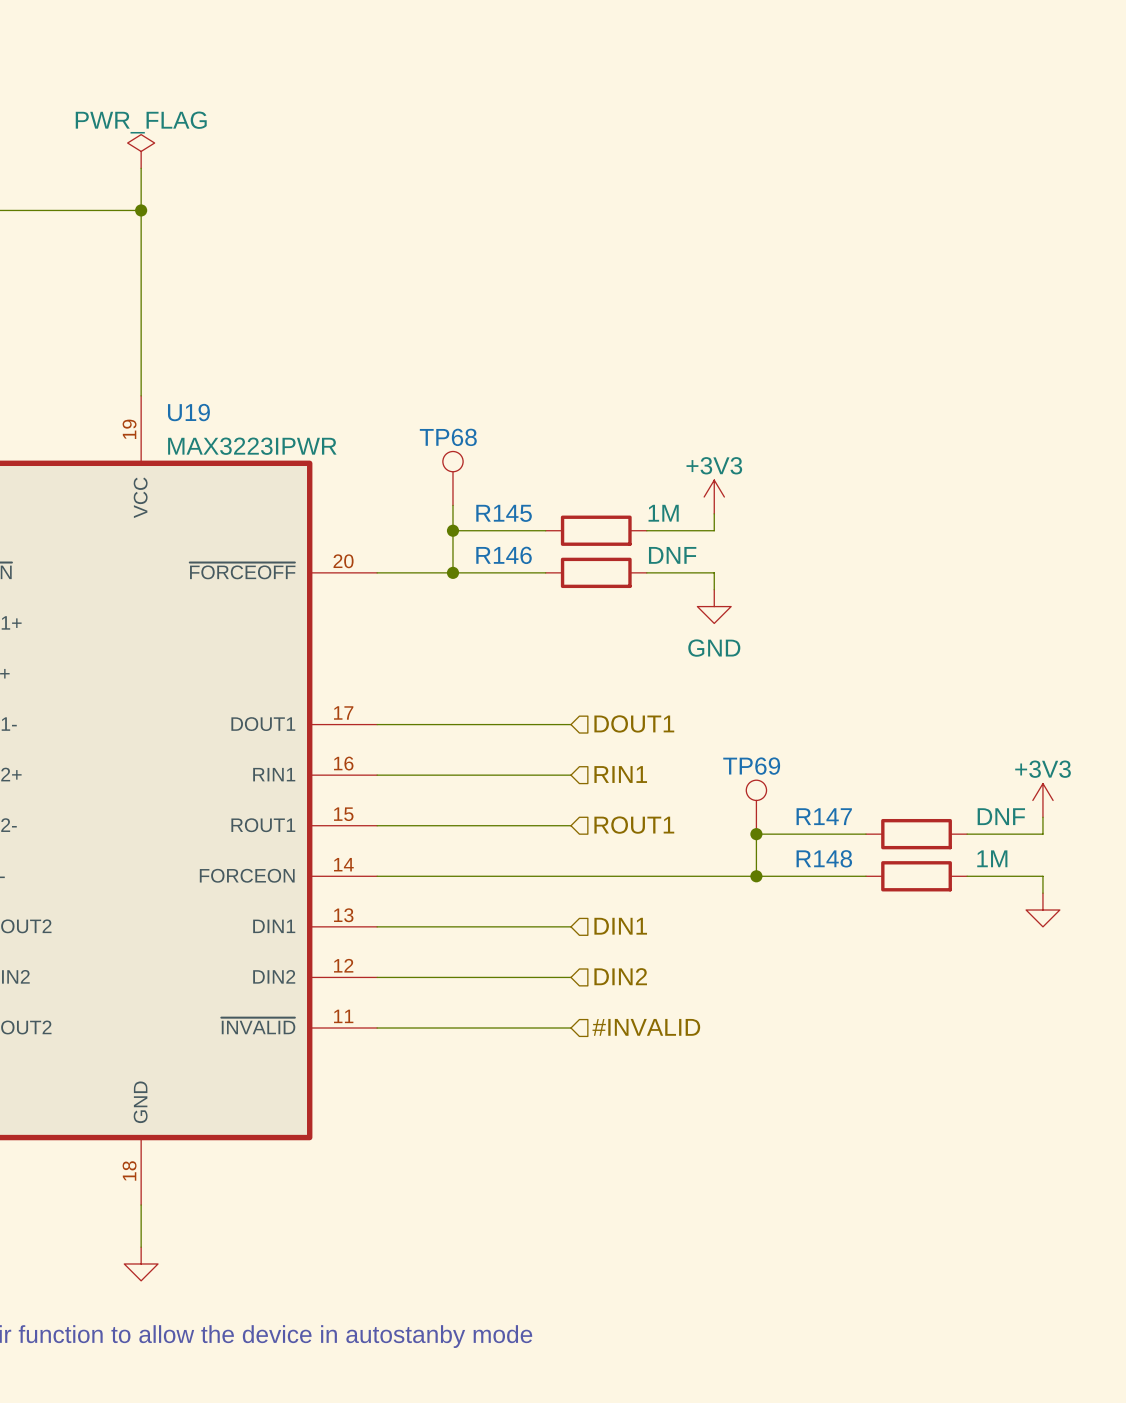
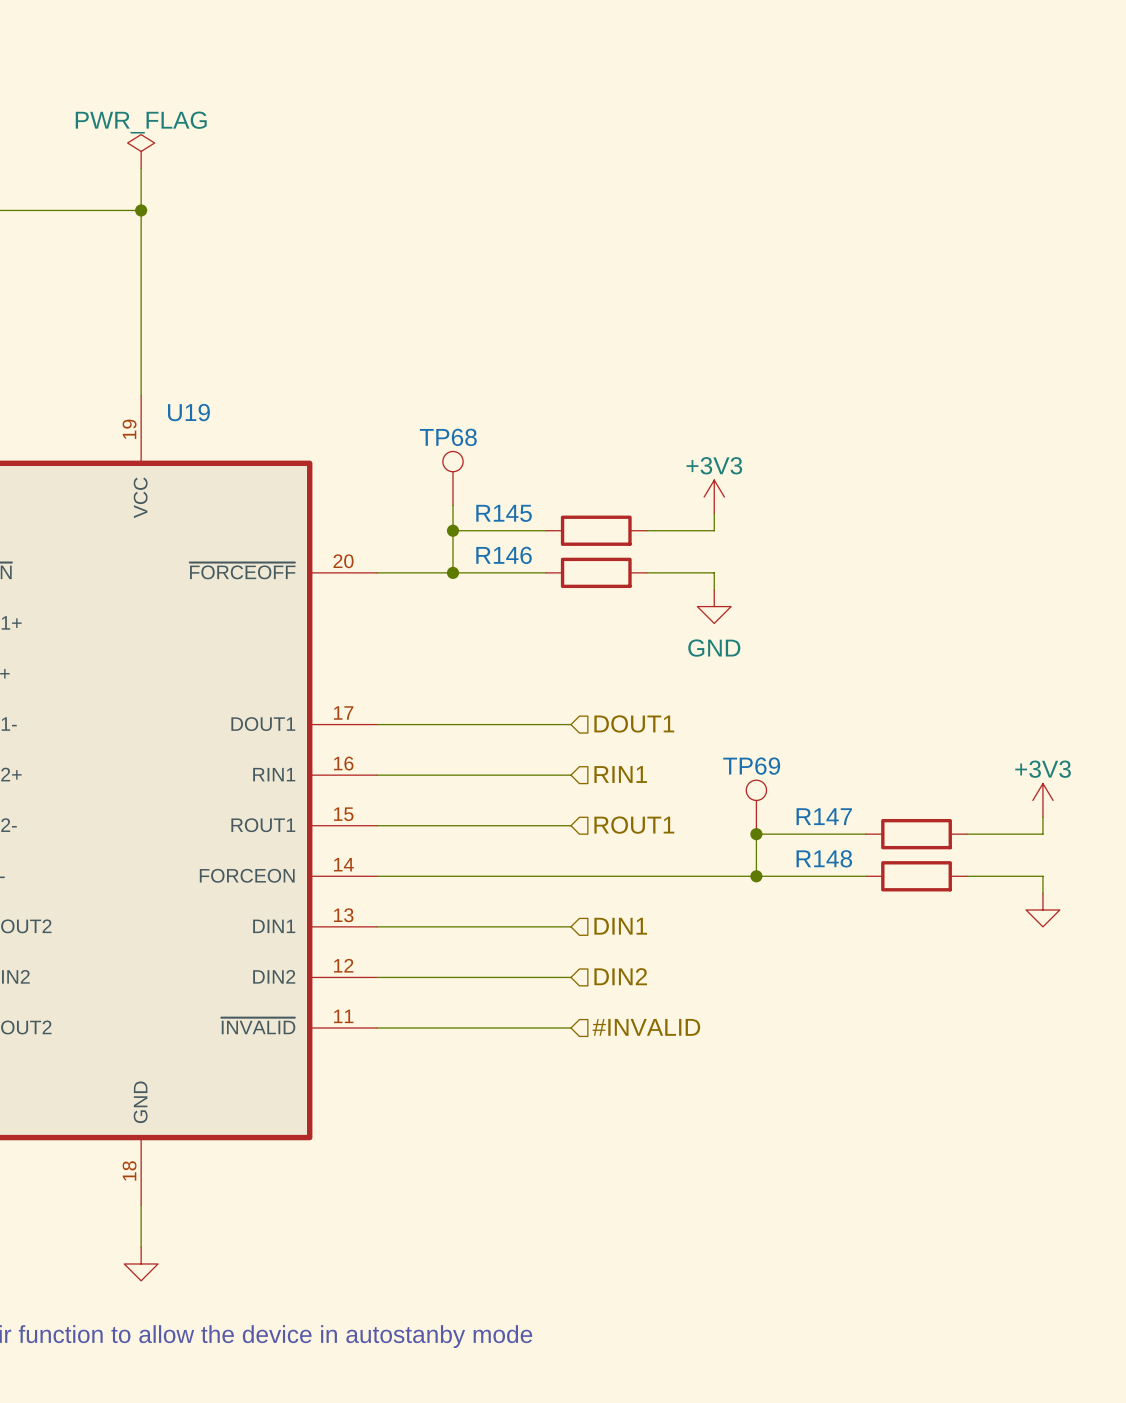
U19 value: MAX3223IPWR (252, 446) -> none
R145 value: 1M (663, 513) -> none
R146 value: DNF (672, 555) -> none
R147 value: DNF (1001, 816) -> none
R148 value: 1M (992, 858) -> none

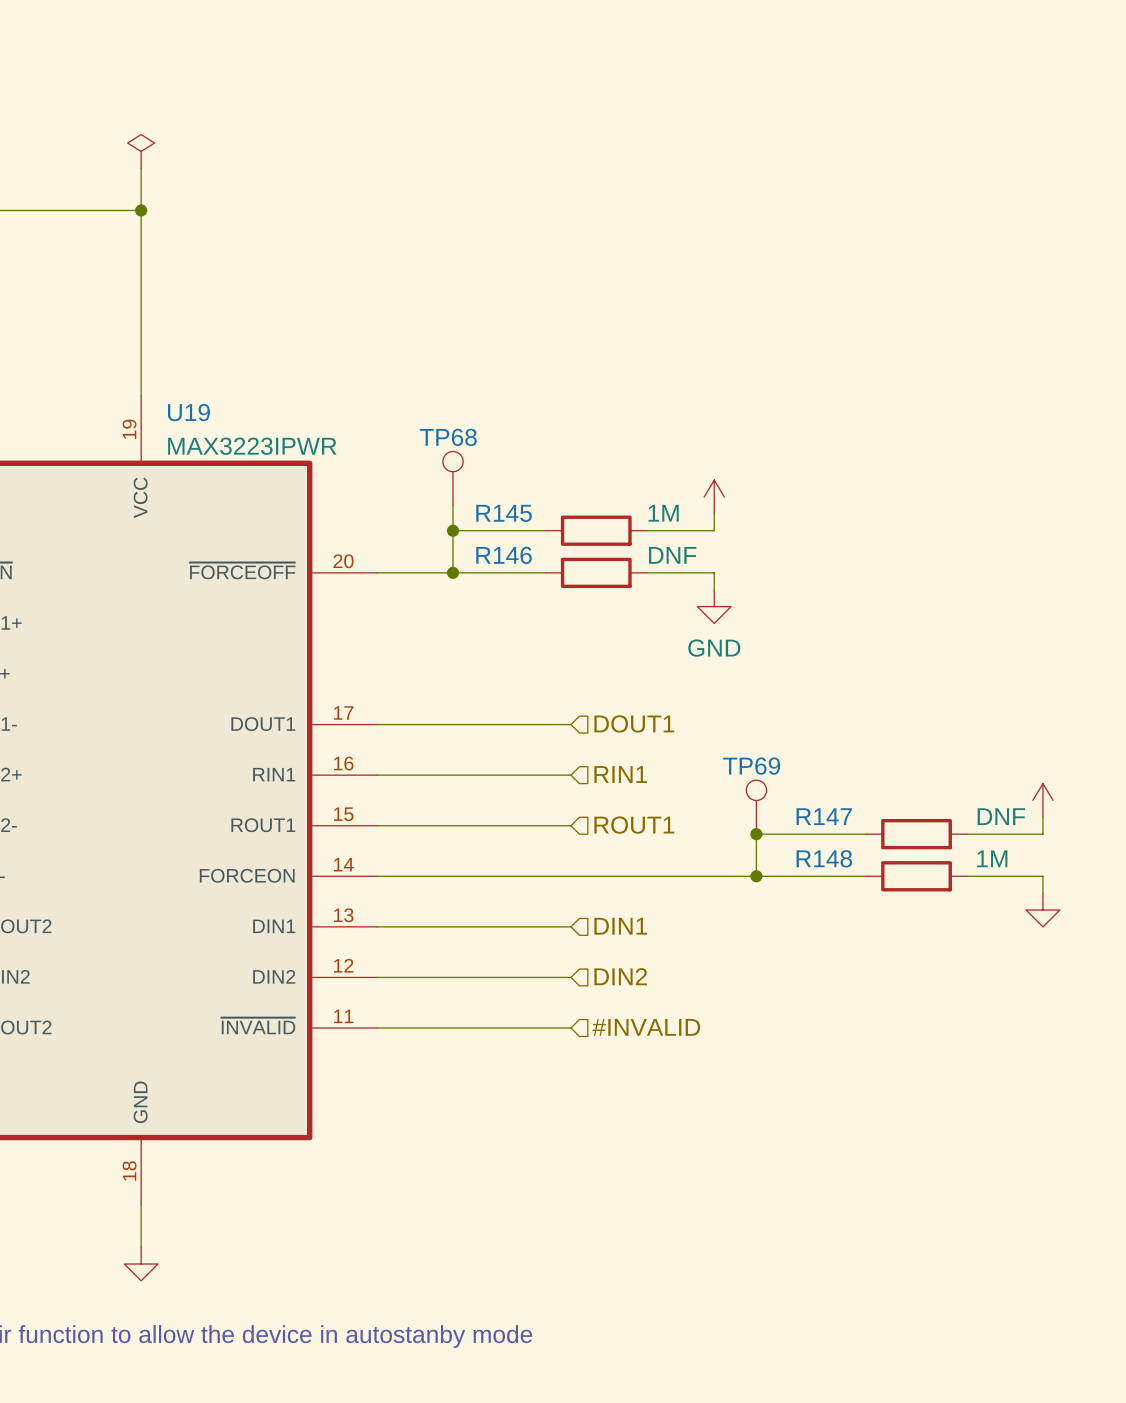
power symbol text: PWR_FLAG (141, 122) -> none
U19 value: none -> MAX3223IPWR (252, 446)
power symbol text: +3V3 (714, 465) -> none
R145 value: none -> 1M (663, 513)
R146 value: none -> DNF (672, 555)
power symbol text: +3V3 (1043, 769) -> none
R147 value: none -> DNF (1001, 816)
R148 value: none -> 1M (992, 858)

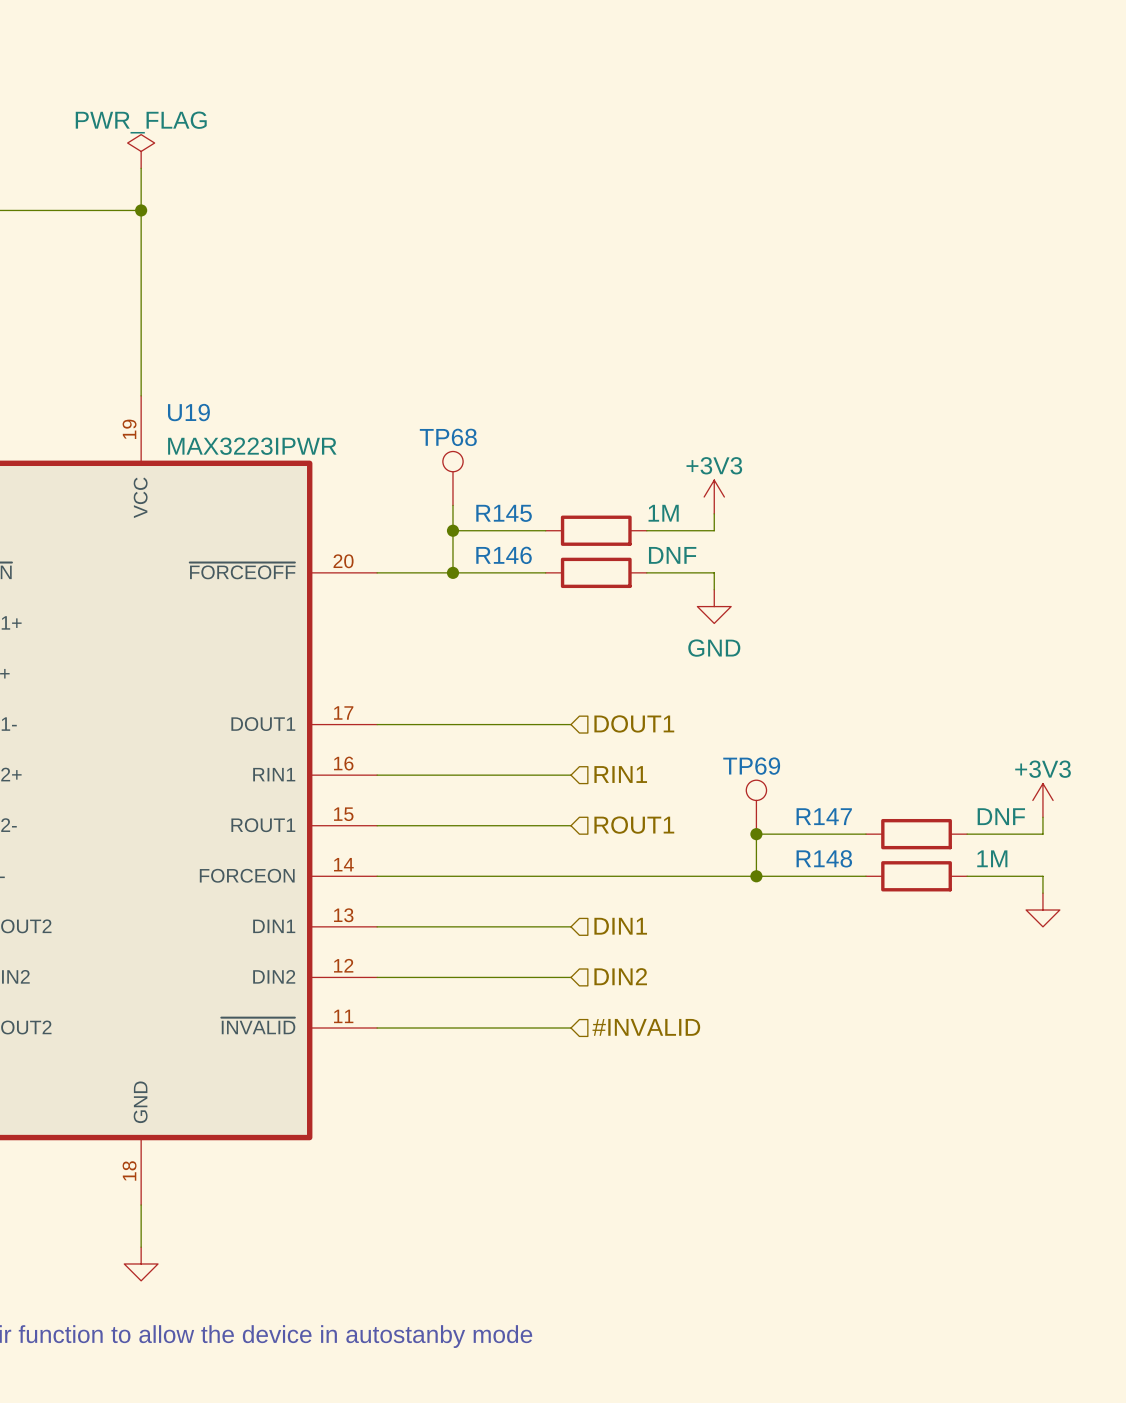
power symbol text: none -> PWR_FLAG (141, 122)
power symbol text: none -> +3V3 (714, 465)
power symbol text: none -> +3V3 (1043, 769)

